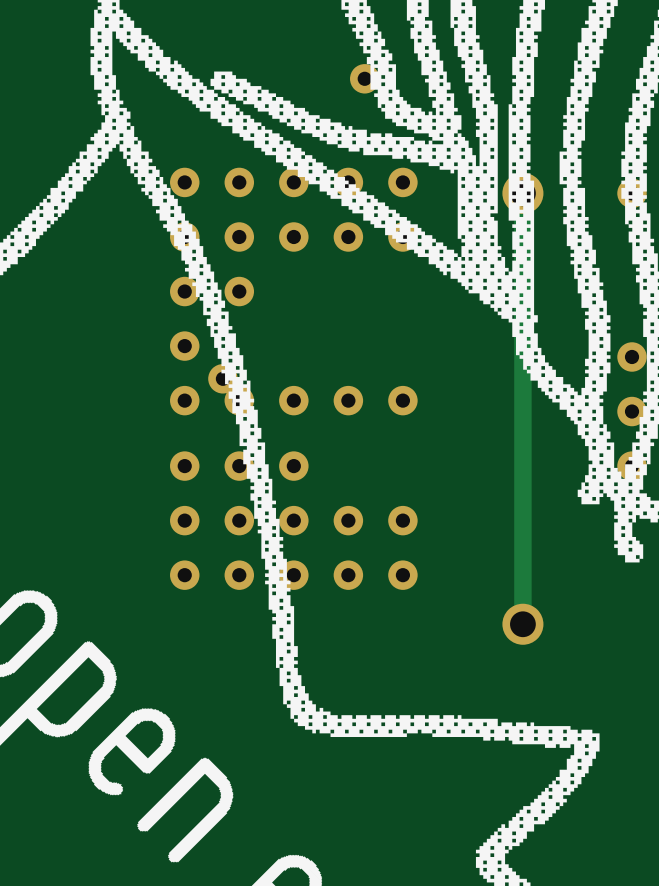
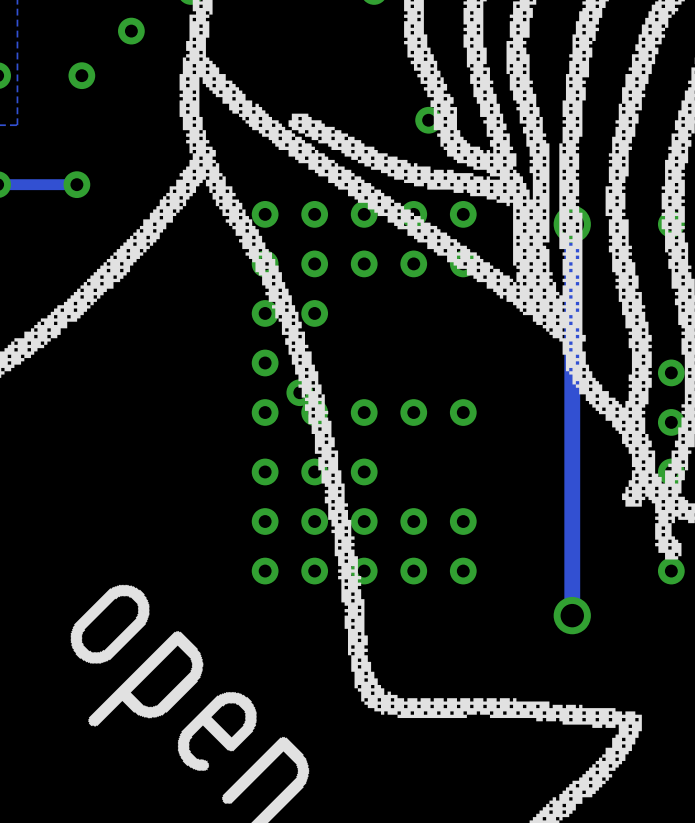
via: none -> (671, 571)

